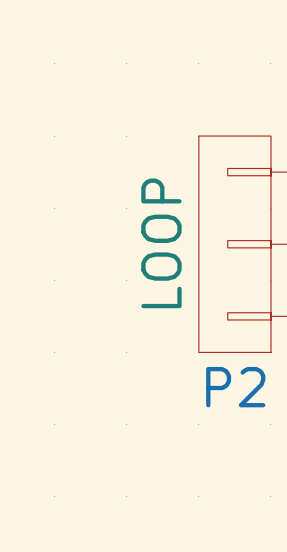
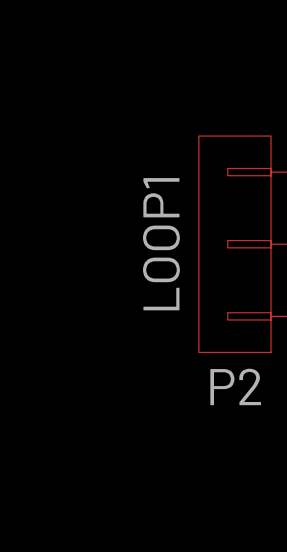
P2 value: LOOP (161, 243) -> LOOP1 (161, 244)

